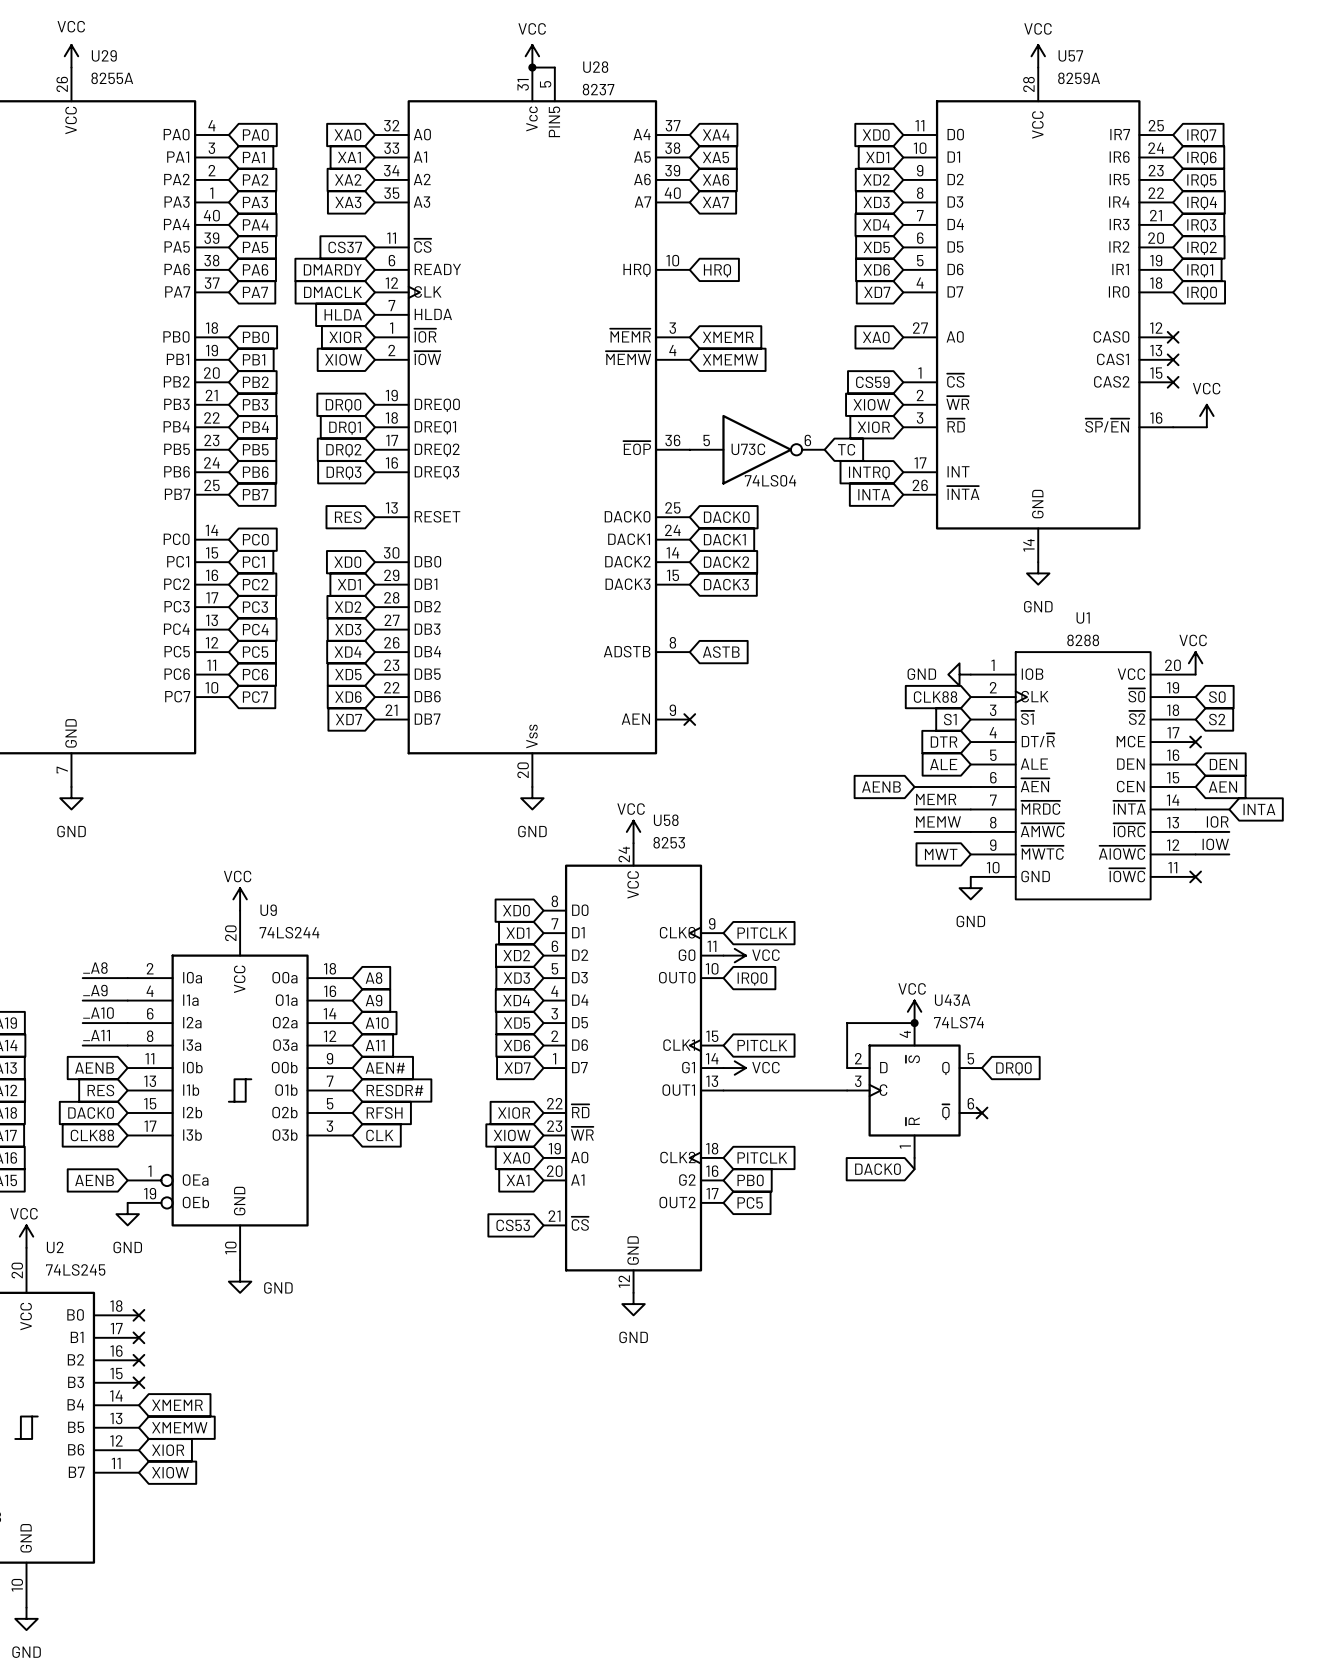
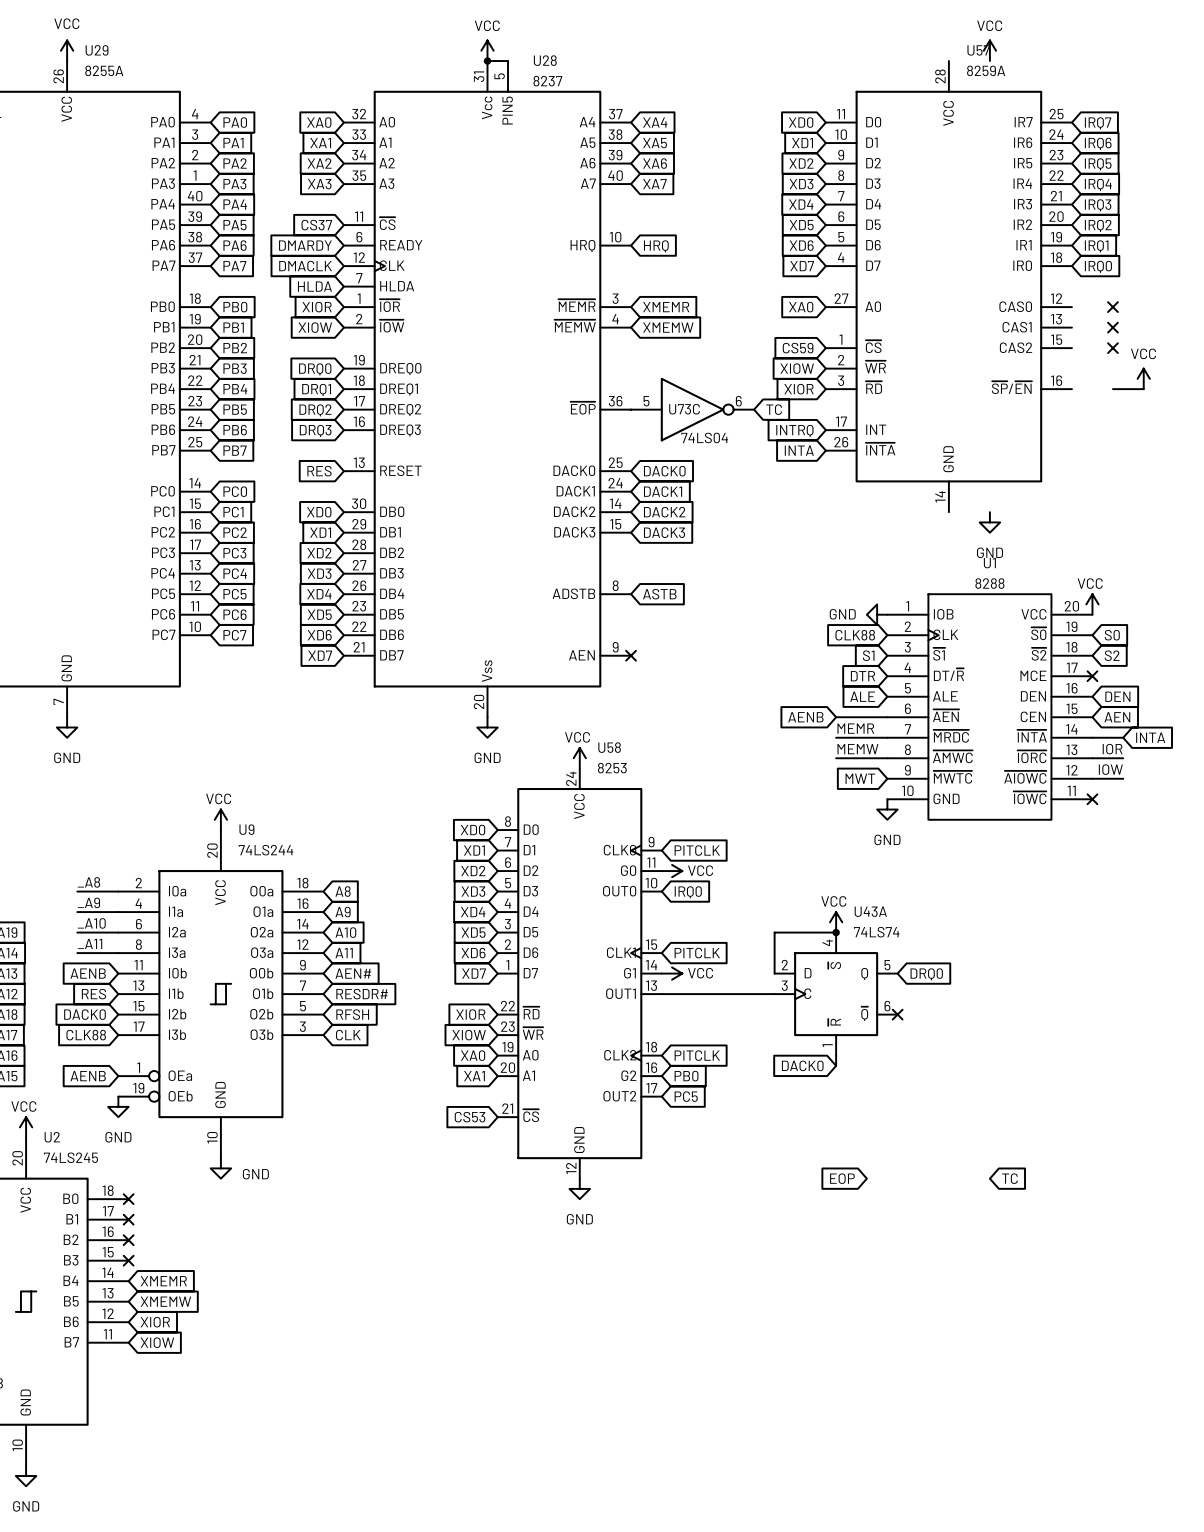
power symbol position: VCC (1038, 56) -> VCC (989, 50)
no-connect mark: (1173, 337) -> none
no-connect mark: none -> (1112, 307)
no-connect mark: (1173, 359) -> none
no-connect mark: none -> (1112, 327)
no-connect mark: (1173, 382) -> none
no-connect mark: none -> (1112, 348)
power symbol position: VCC (1206, 416) -> VCC (1143, 378)
wire: (1173, 427) (1206, 427) -> (1112, 389) (1143, 389)
power symbol position: GND (1038, 573) -> GND (989, 522)
global label: none -> EOP (842, 1178)
global label: none -> TC (1009, 1178)

